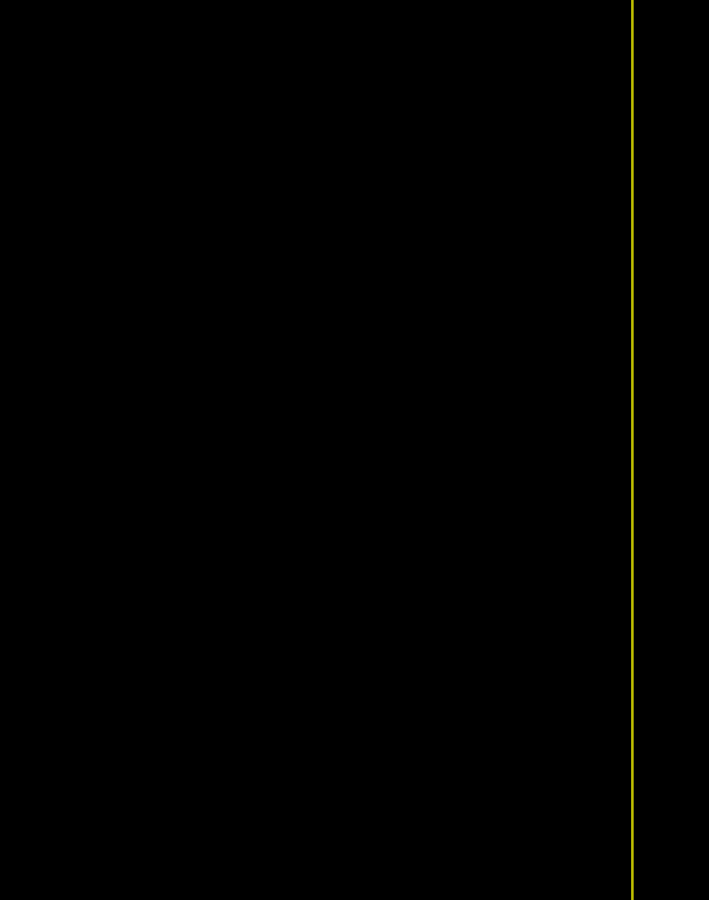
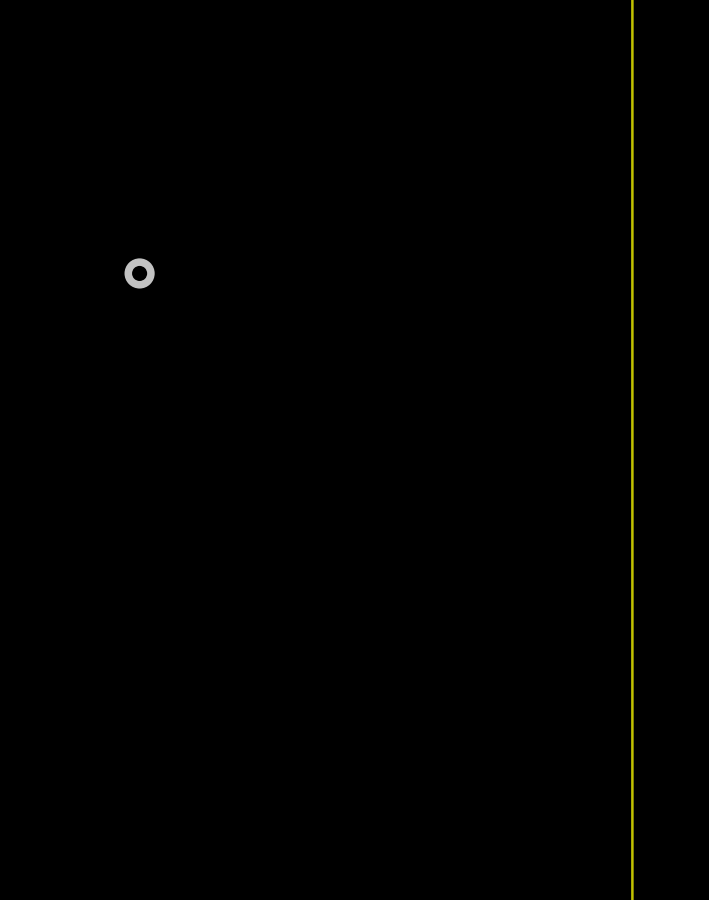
via: none -> (139, 273)

